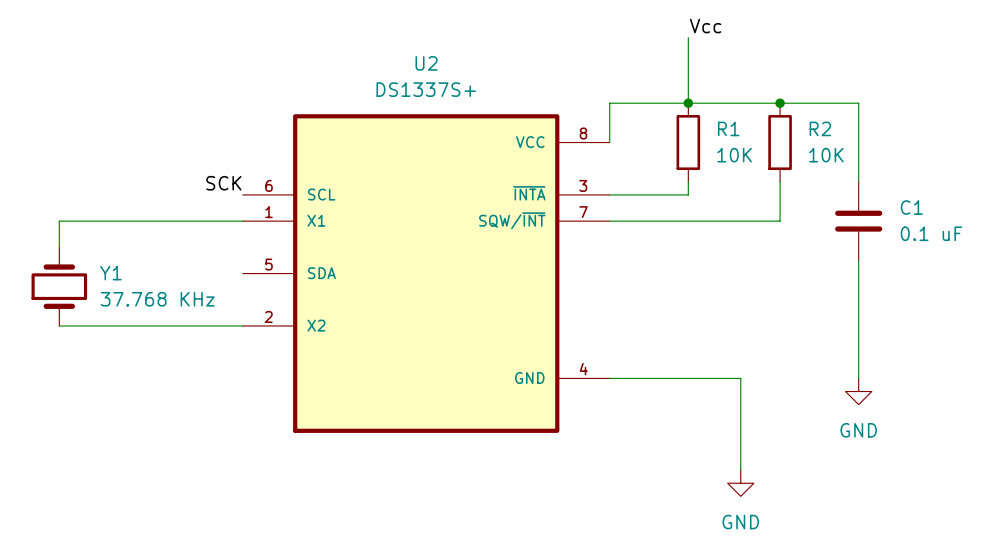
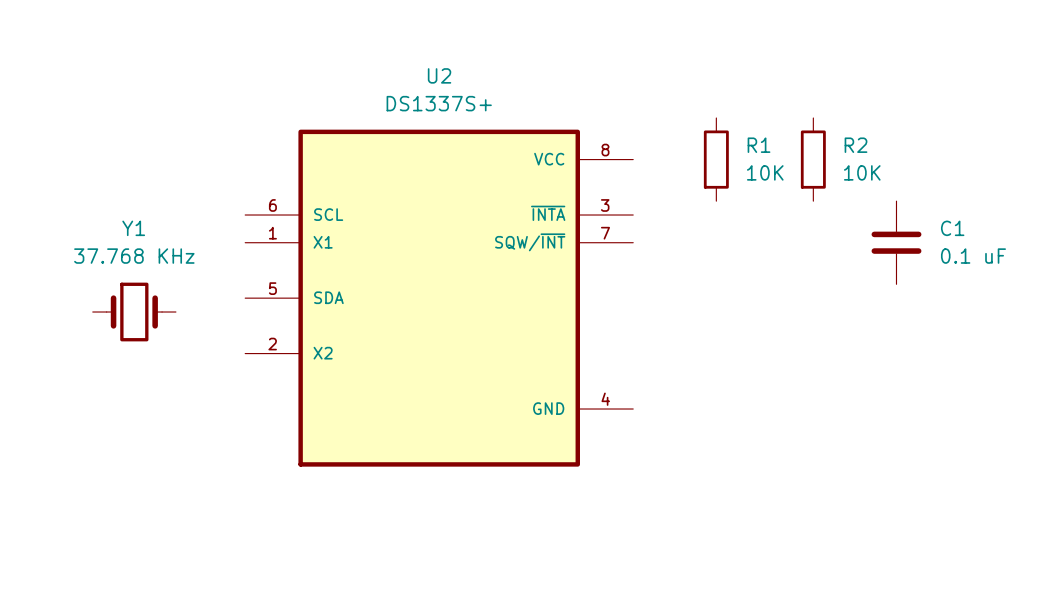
label: Vcc (705, 25) -> none
wire: (688, 37) (688, 103) -> none
junction: (688, 103) -> none
junction: (780, 103) -> none
wire: (609, 142) (609, 103) (858, 103) (858, 181) -> none
wire: (688, 181) (688, 194) (609, 194) -> none
wire: (780, 181) (780, 221) (609, 221) -> none
label: SCK (223, 183) -> none
wire: (242, 221) (59, 221) (59, 247) -> none
wire: (858, 260) (858, 378) -> none
Y1 name position: Y1 (110, 273) -> Y1 (133, 228)
Y1 rotation: 0° (59, 286) -> 90° clockwise (134, 312)
Y1 position: (59, 286) -> (134, 312)
Y1 value position: 37.768 KHz (157, 299) -> 37.768 KHz (134, 256)
wire: (59, 325) (242, 325) -> none
wire: (609, 378) (740, 378) (740, 470) -> none
power symbol: GND (858, 391) -> none
power symbol: GND (740, 483) -> none

